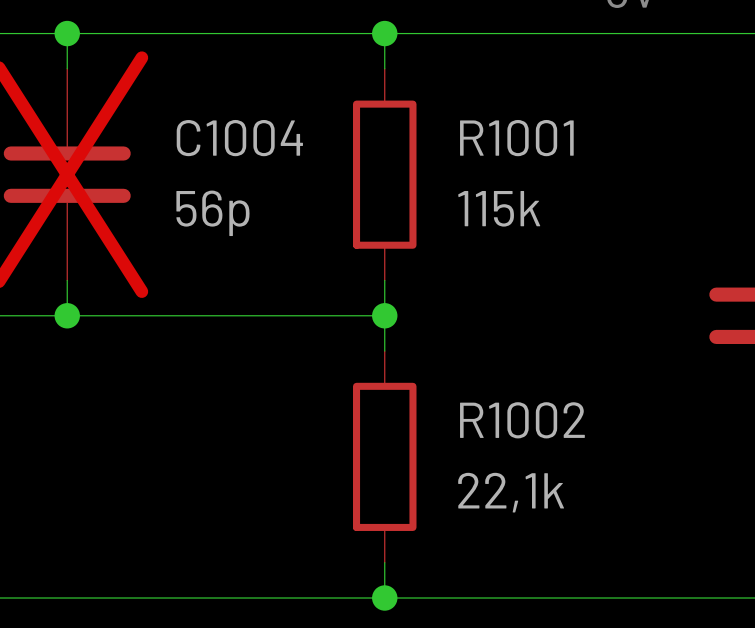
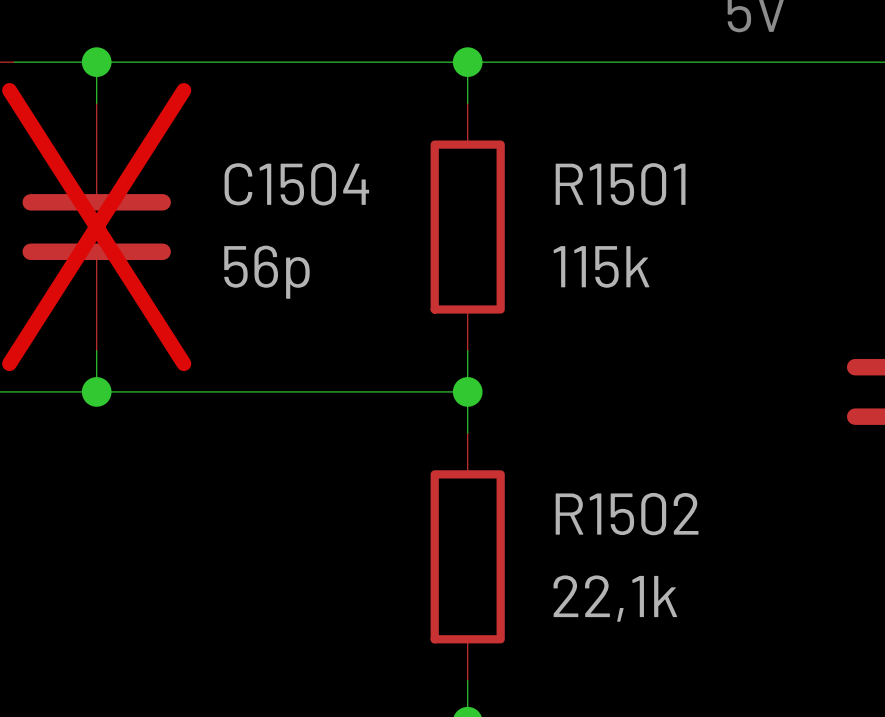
C1004 name: C1004 (239, 138) -> C1504 (296, 184)
R1001 name: R1001 (516, 138) -> R1501 (620, 184)
R1002 name: R1002 (522, 420) -> R1502 (627, 514)

